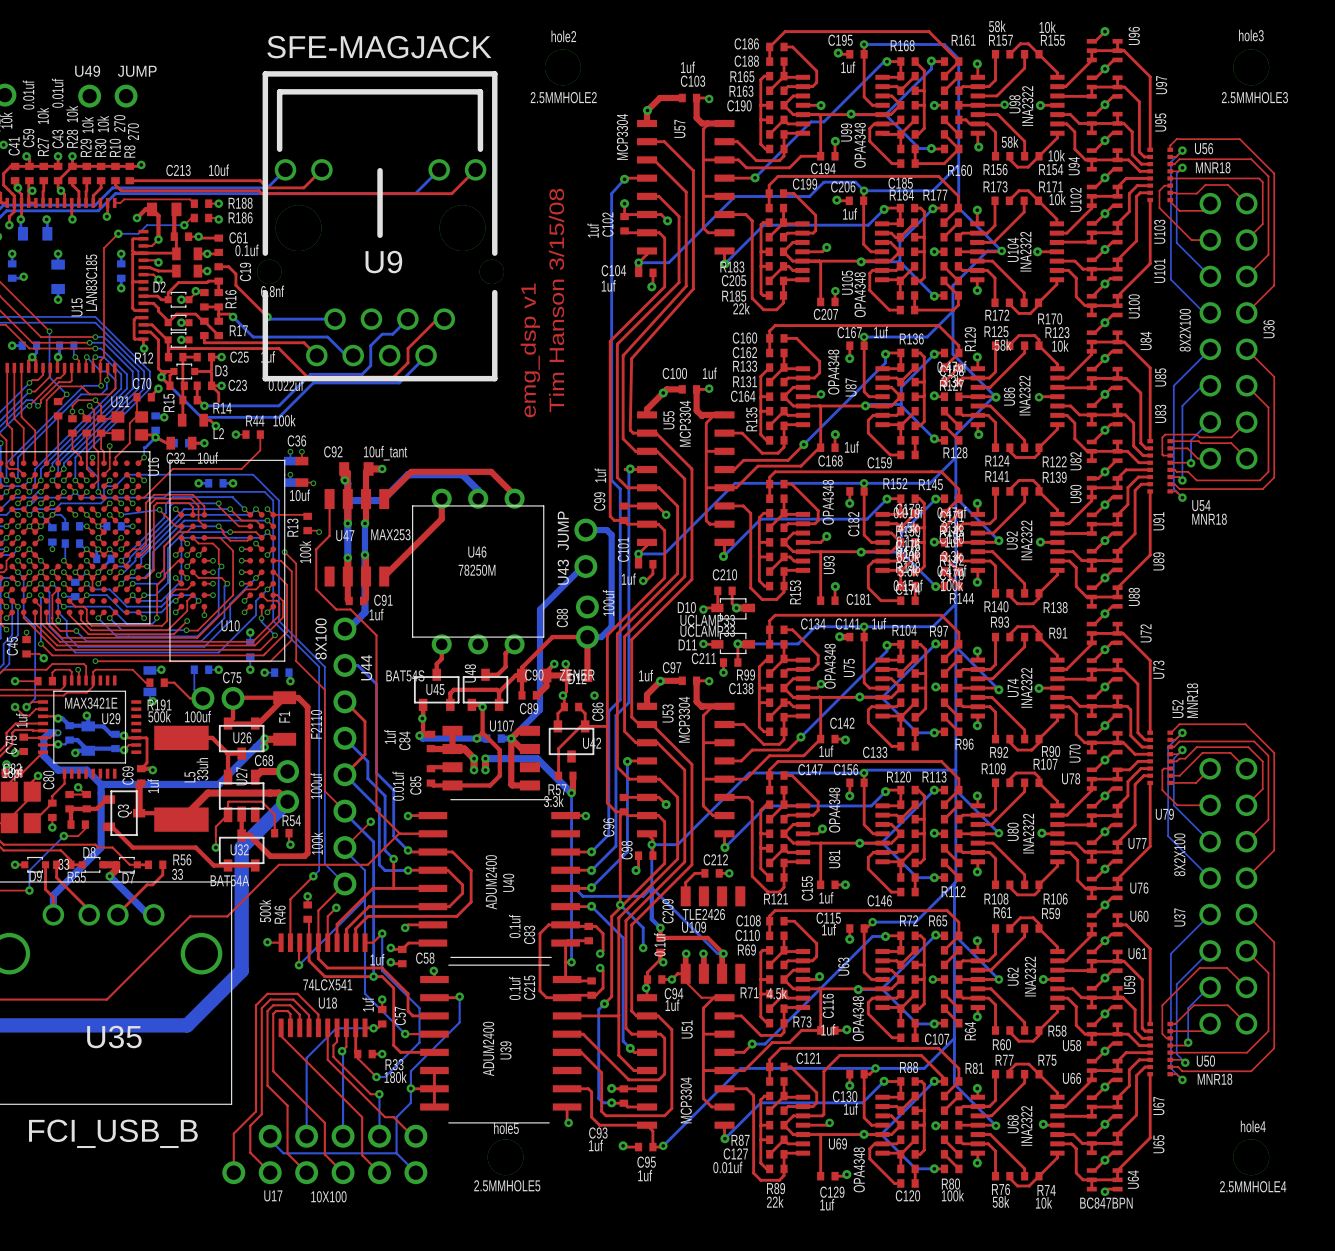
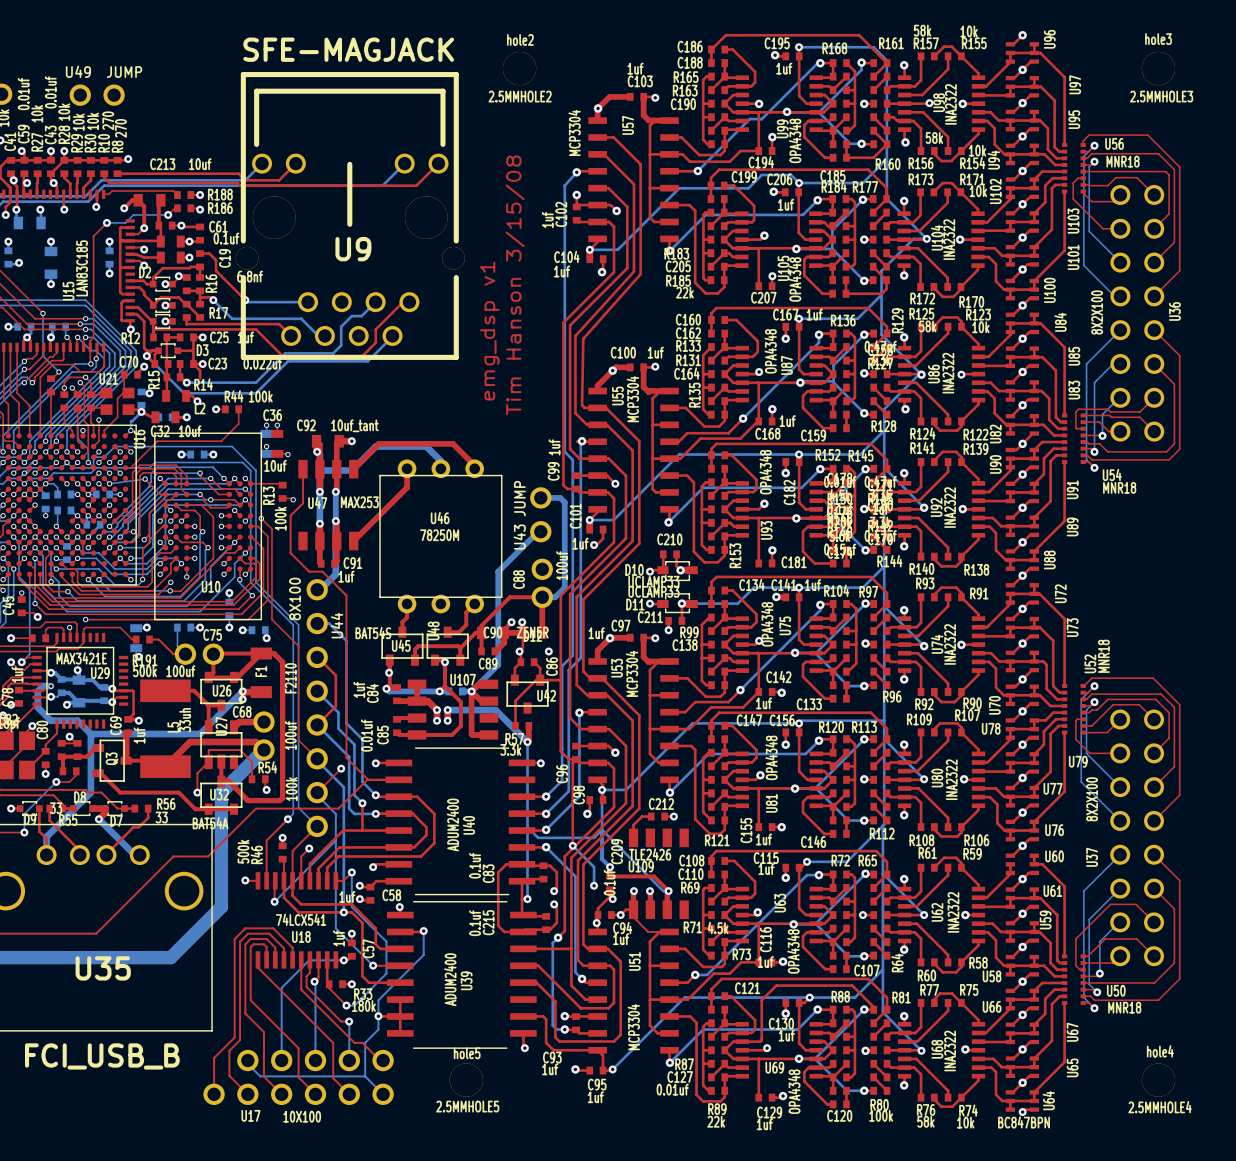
R144 value: 100k (952, 585) -> none

